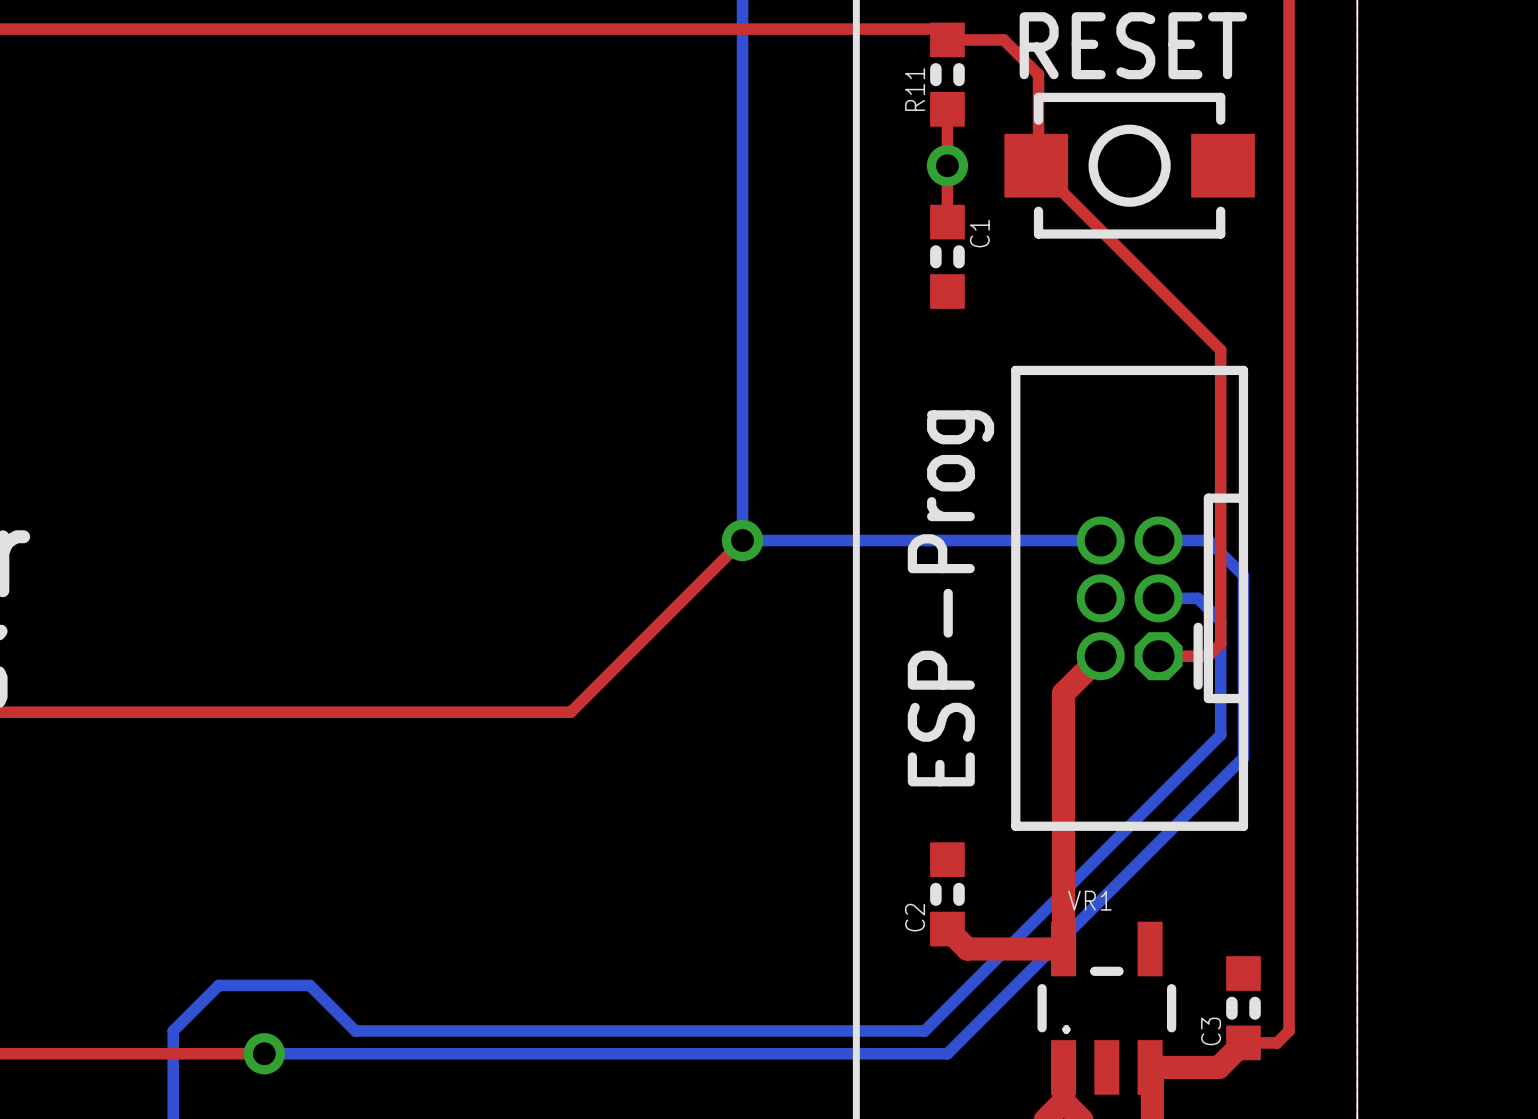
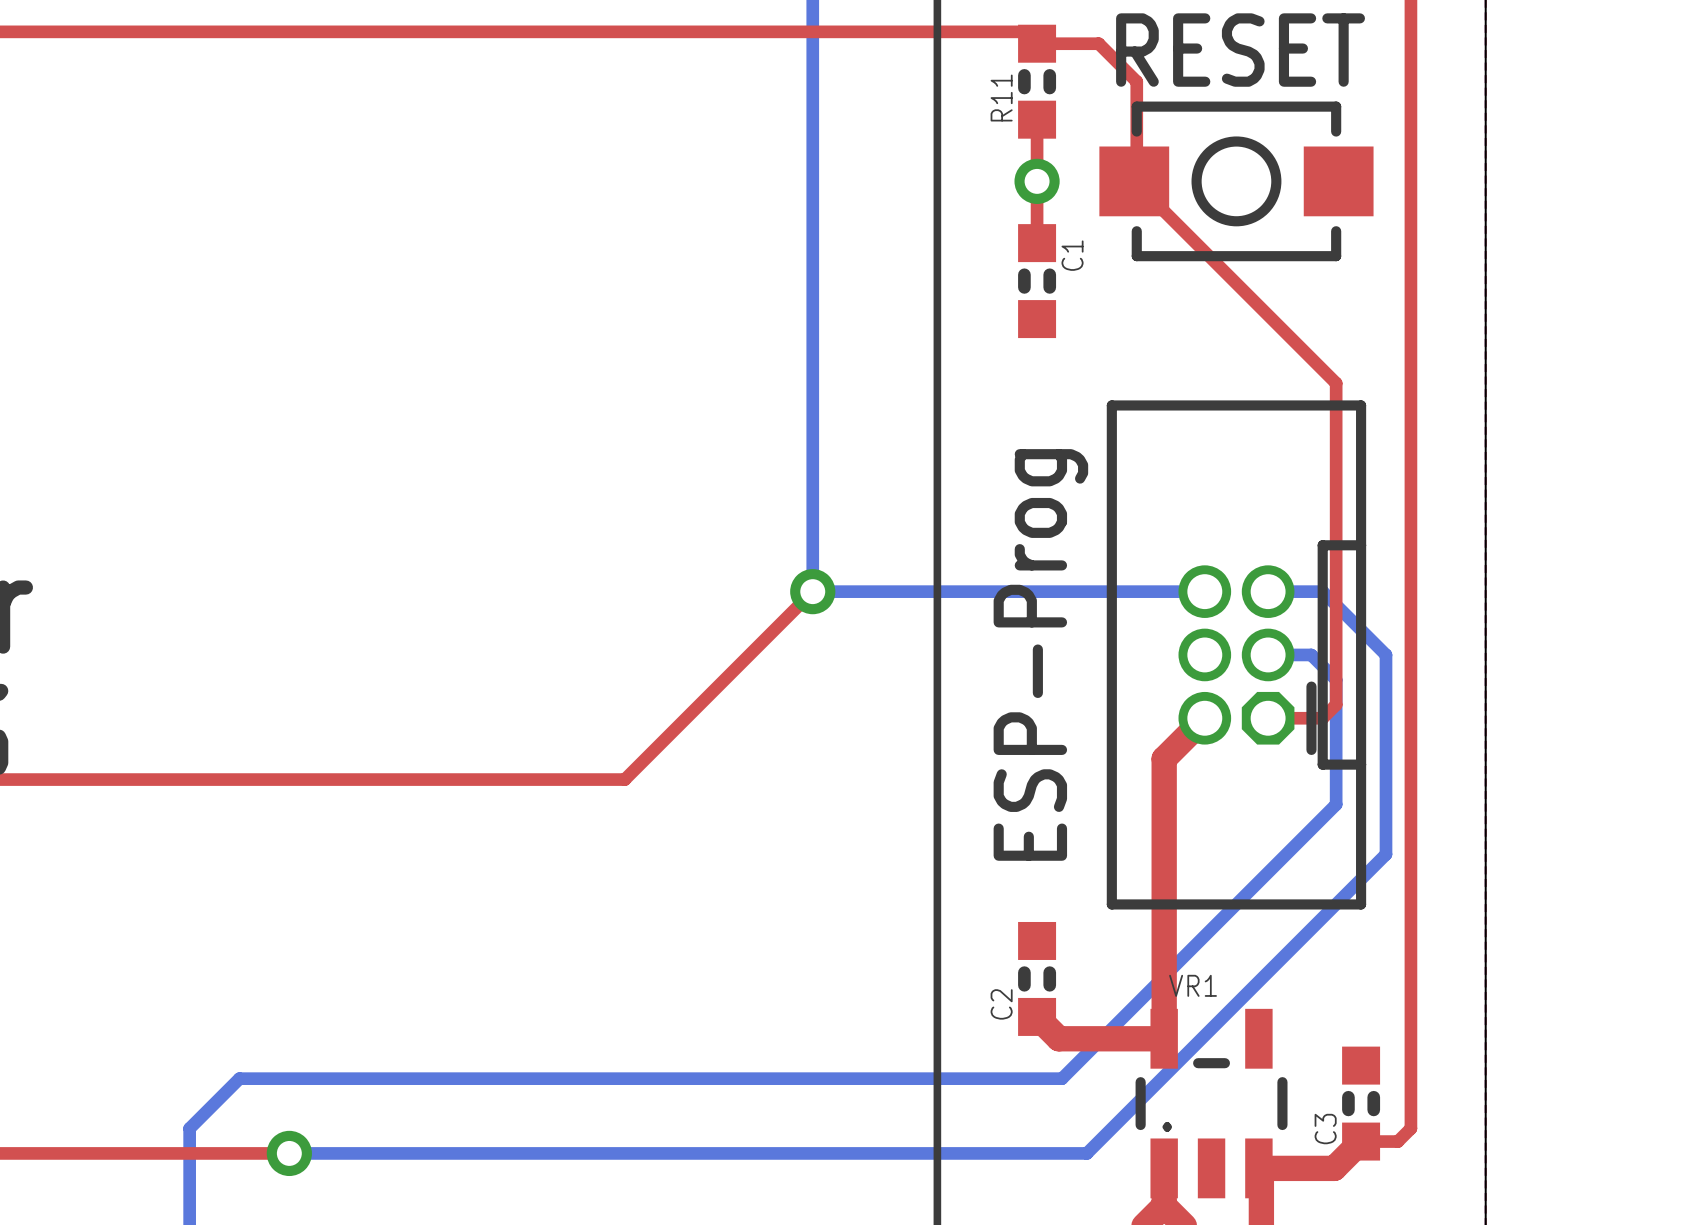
bottom track: (1243, 575) (1243, 757) (947, 1053) -> (1361, 630) (1386, 654) (1386, 854) (1086, 1153) (1037, 1153)
bottom track: (309, 985) (355, 1030) (924, 1030) (970, 985) -> (339, 1078) (1061, 1078)

